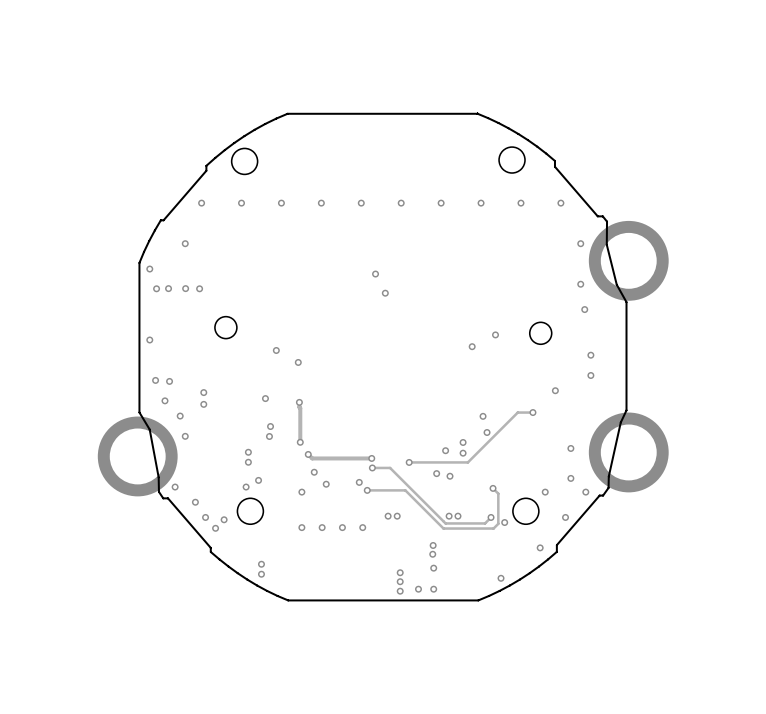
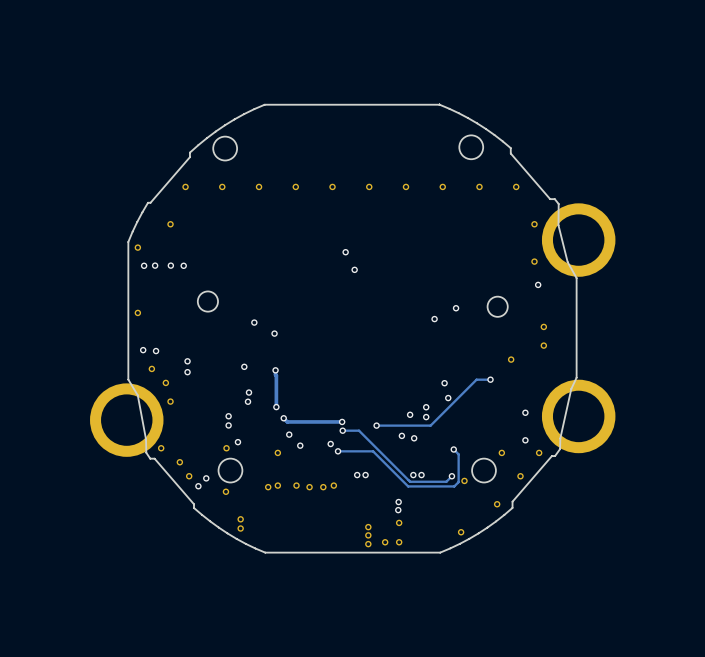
part: (342, 527) -> none
part: none -> (268, 487)
part: none -> (309, 487)
part: none -> (323, 487)
part: none -> (225, 491)

